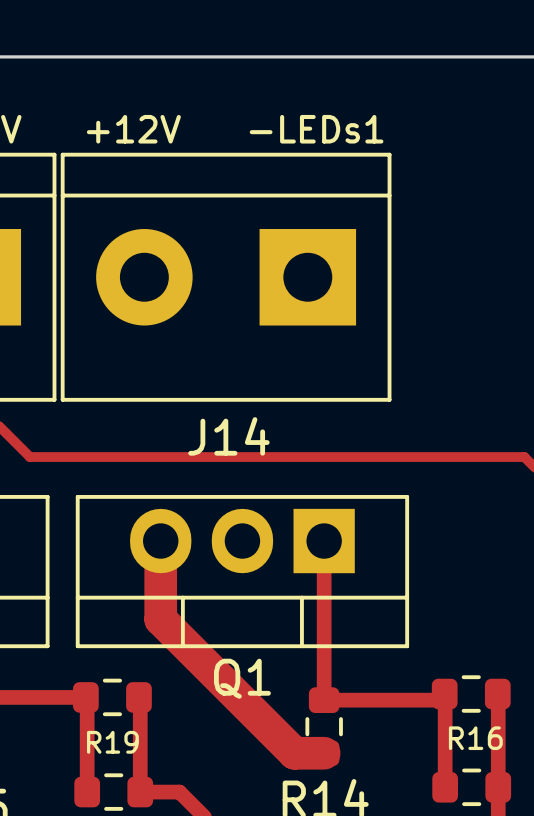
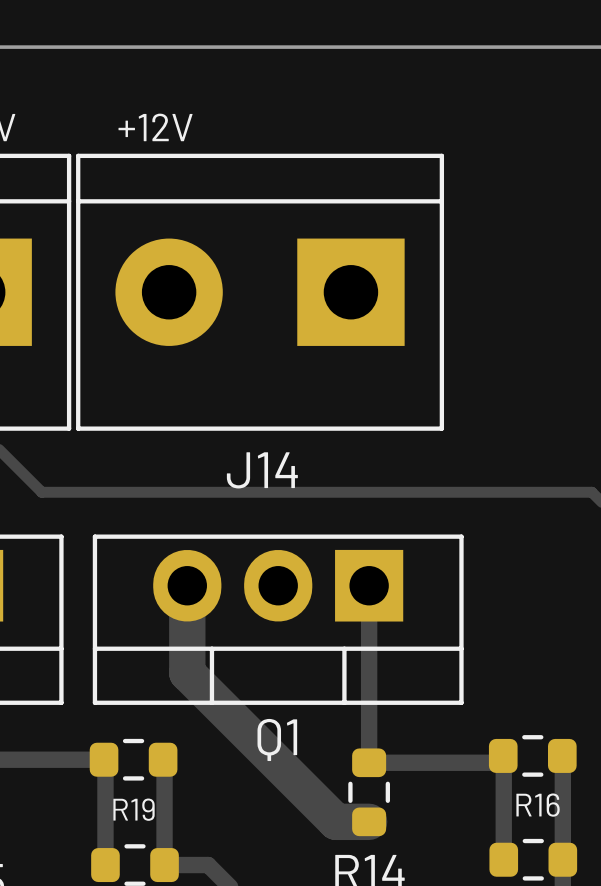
text: -LEDs1 (316, 129) -> none

